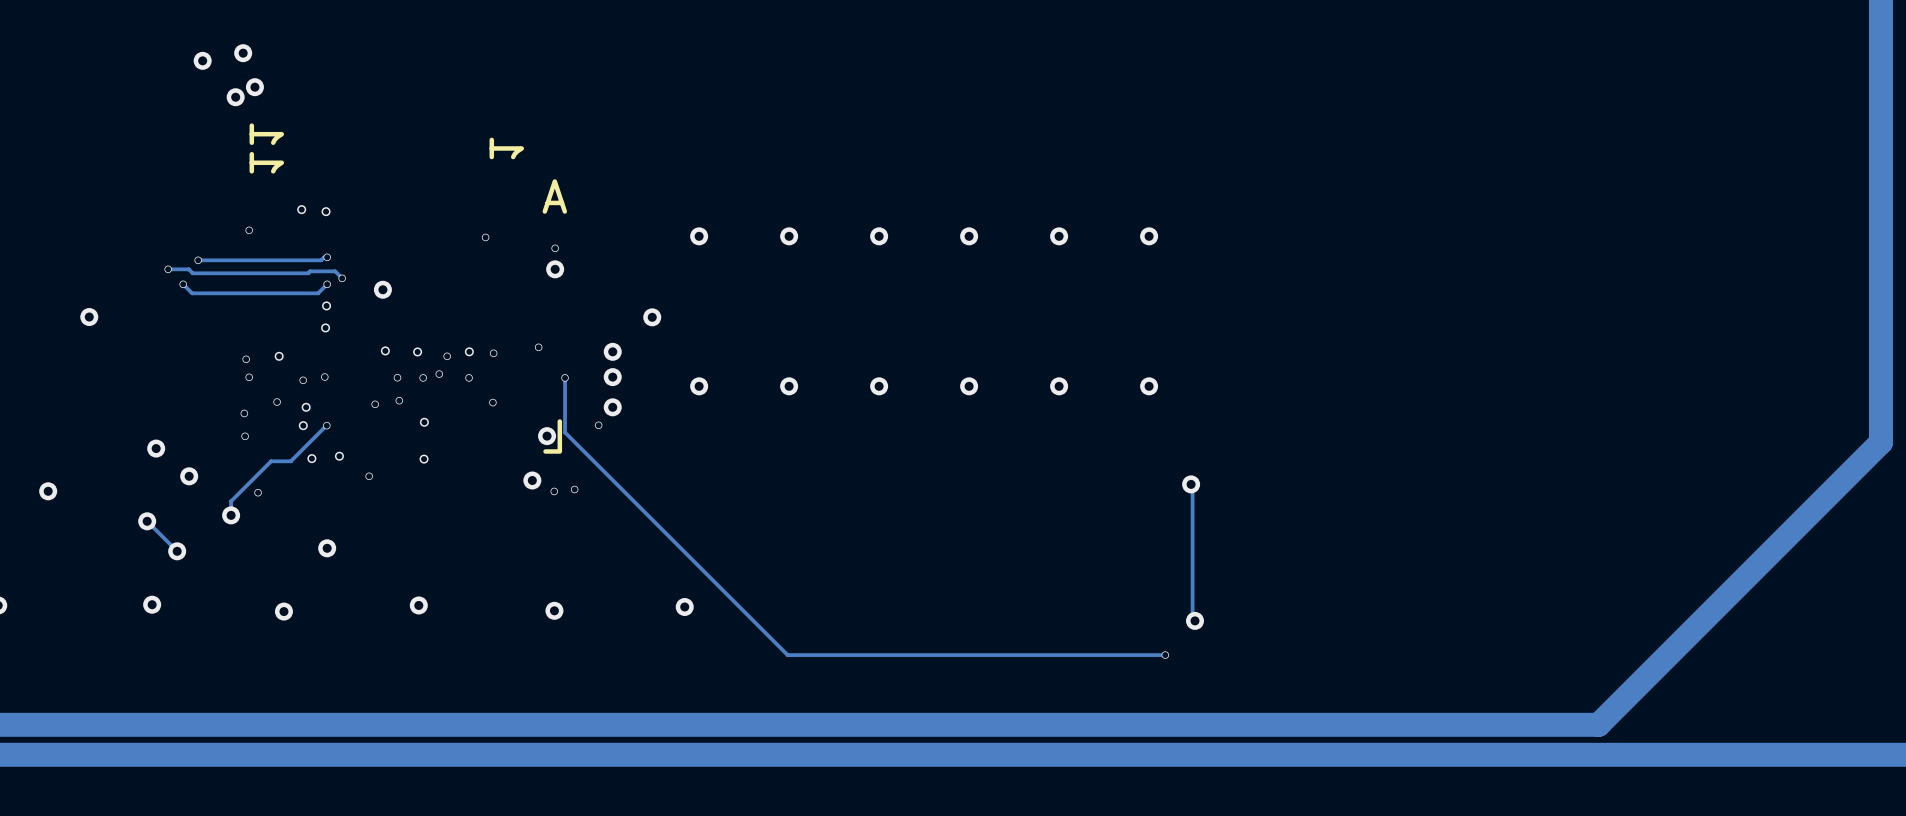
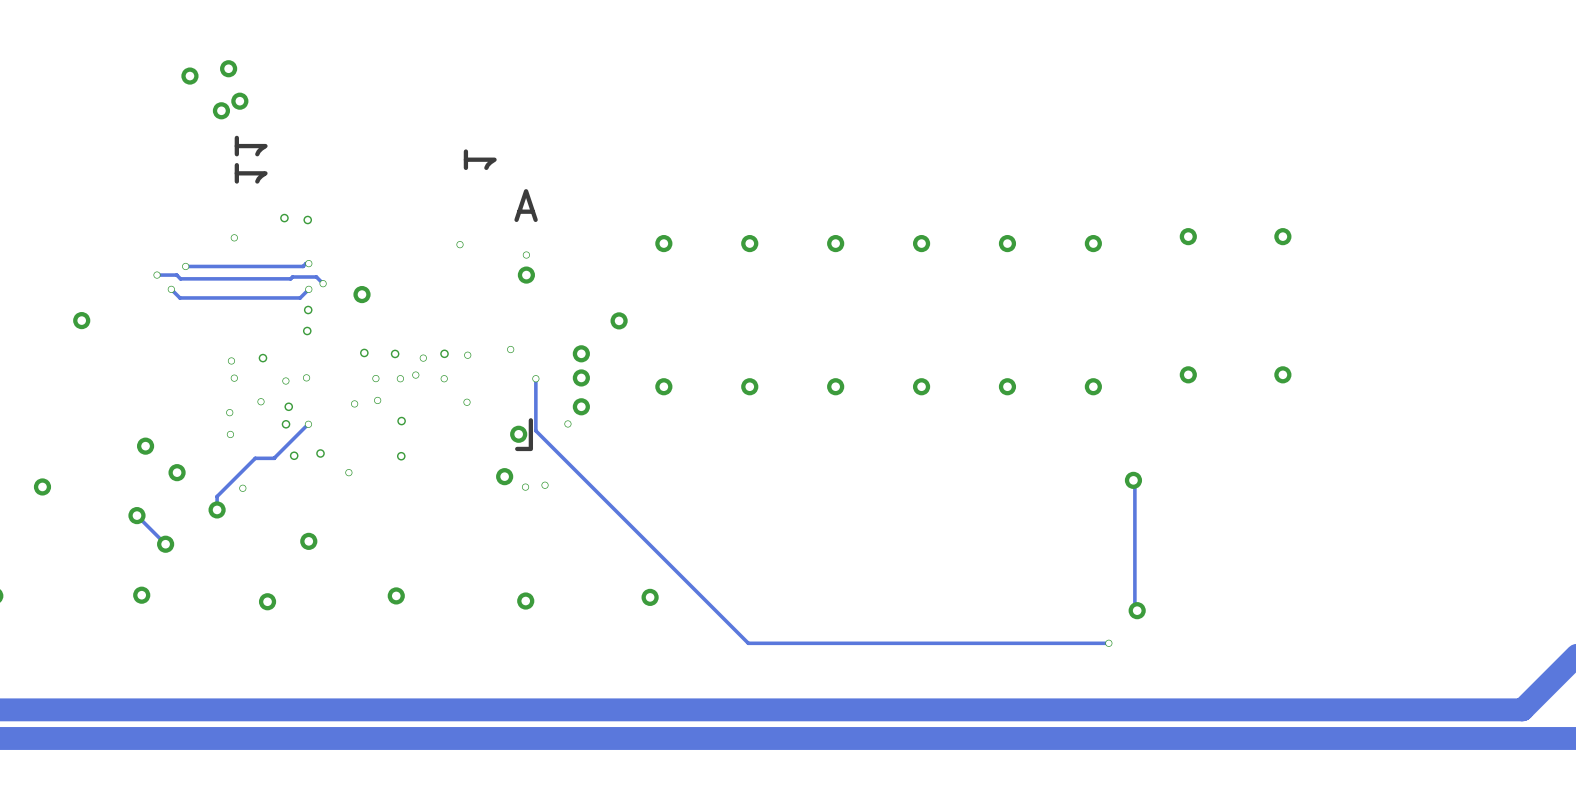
via: none -> (1188, 236)
via: none -> (1282, 236)
via: none -> (1188, 374)
via: none -> (1282, 374)

